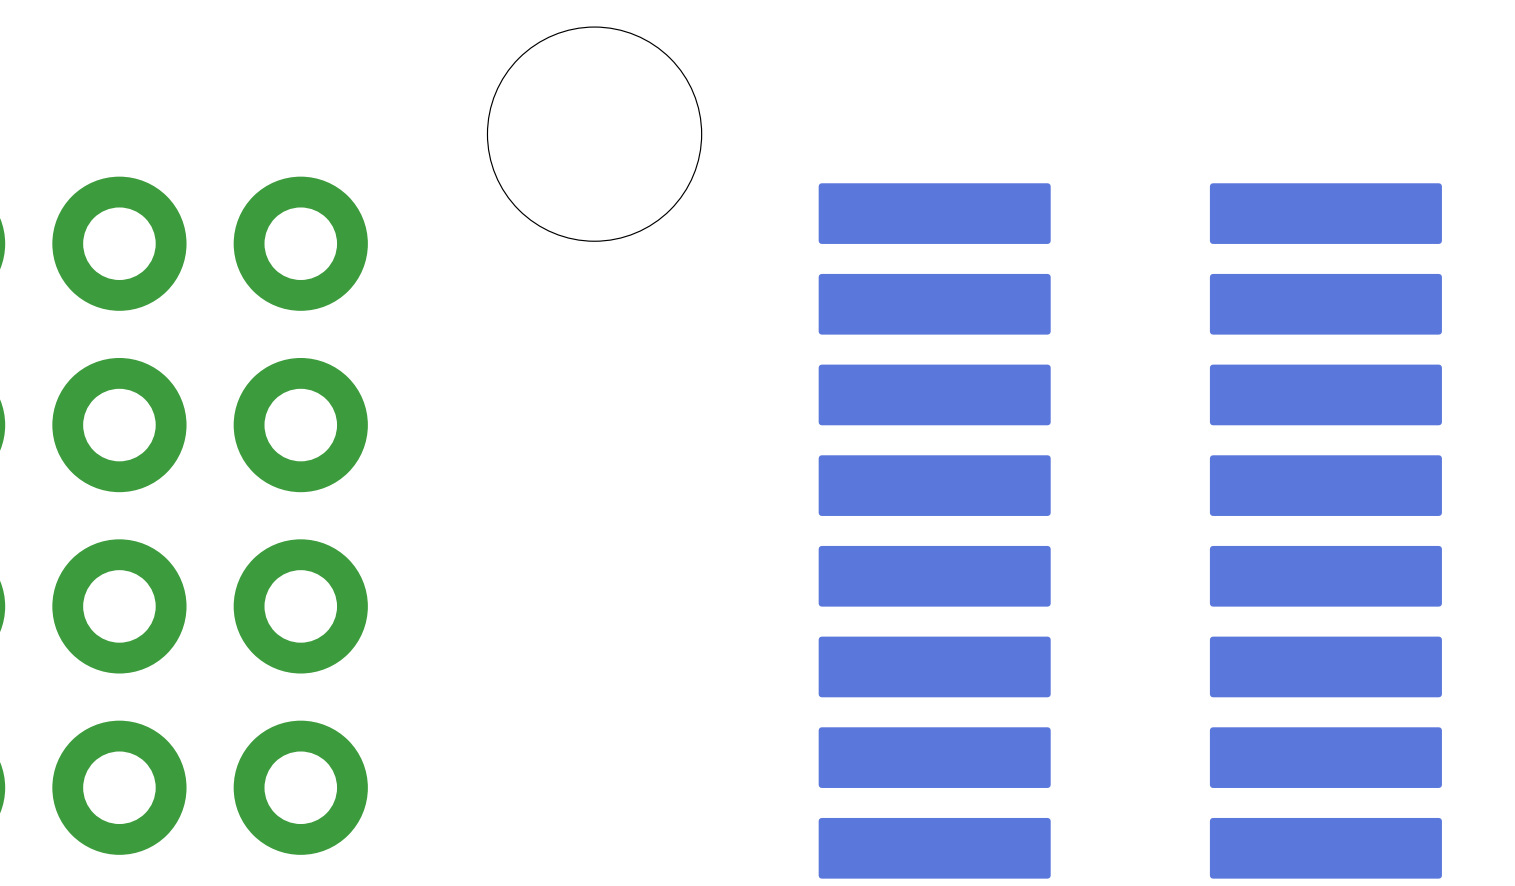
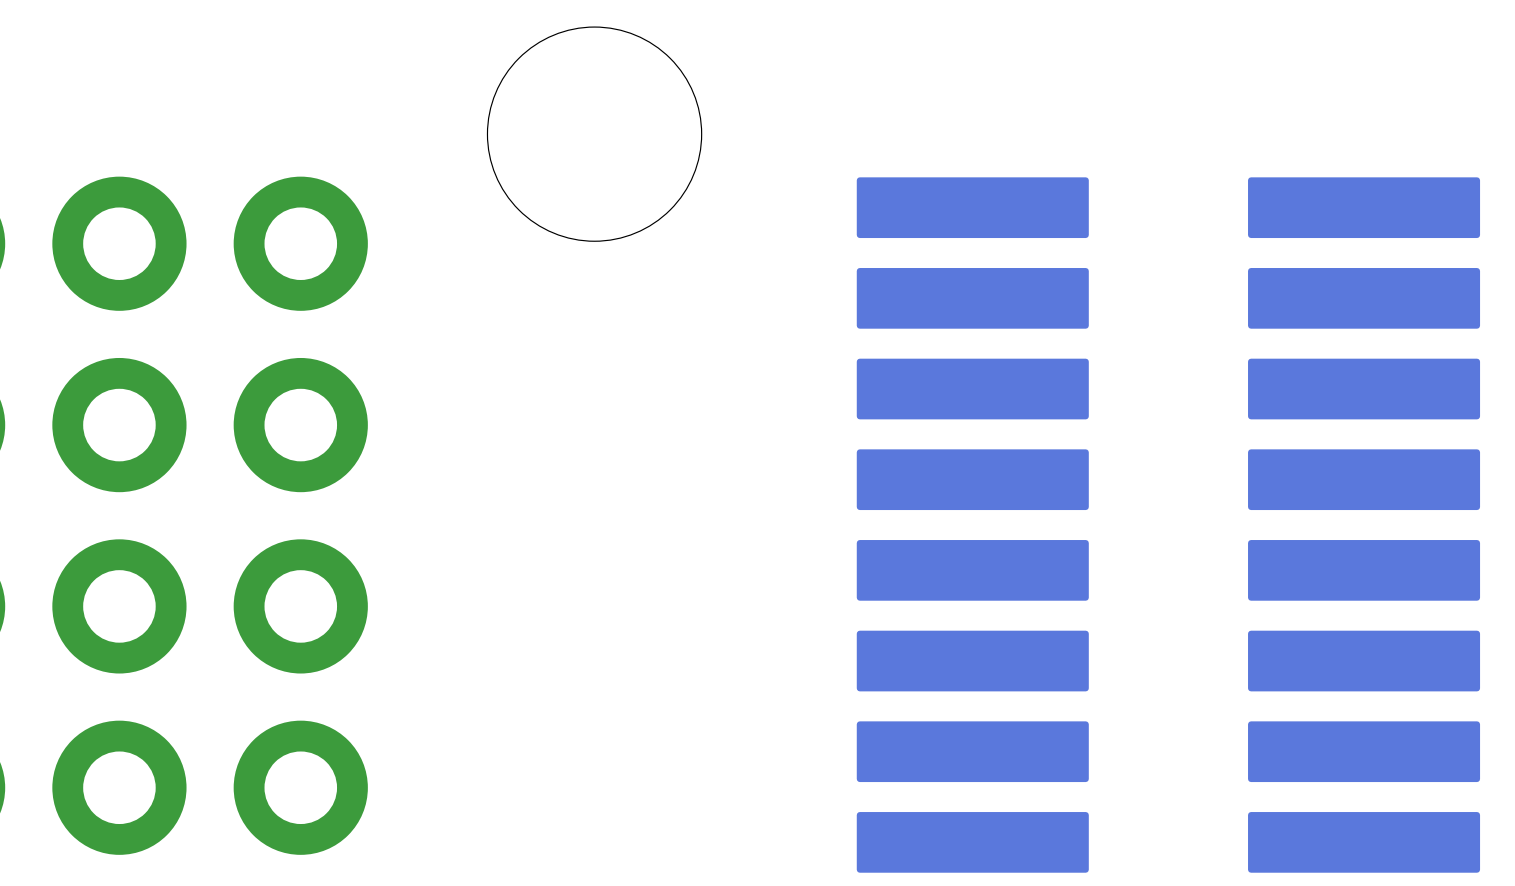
part position: (934, 213) -> (972, 207)
part position: (1325, 213) -> (1364, 207)
part position: (934, 304) -> (972, 298)
part position: (1325, 304) -> (1364, 298)
part position: (934, 394) -> (972, 389)
part position: (1325, 394) -> (1364, 389)
part position: (934, 485) -> (972, 479)
part position: (1325, 485) -> (1364, 479)
part position: (934, 576) -> (972, 570)
part position: (1325, 576) -> (1364, 570)
part position: (934, 666) -> (972, 661)
part position: (1325, 666) -> (1364, 661)
part position: (934, 757) -> (972, 751)
part position: (1325, 757) -> (1364, 751)
part position: (934, 848) -> (972, 842)
part position: (1325, 848) -> (1364, 842)

